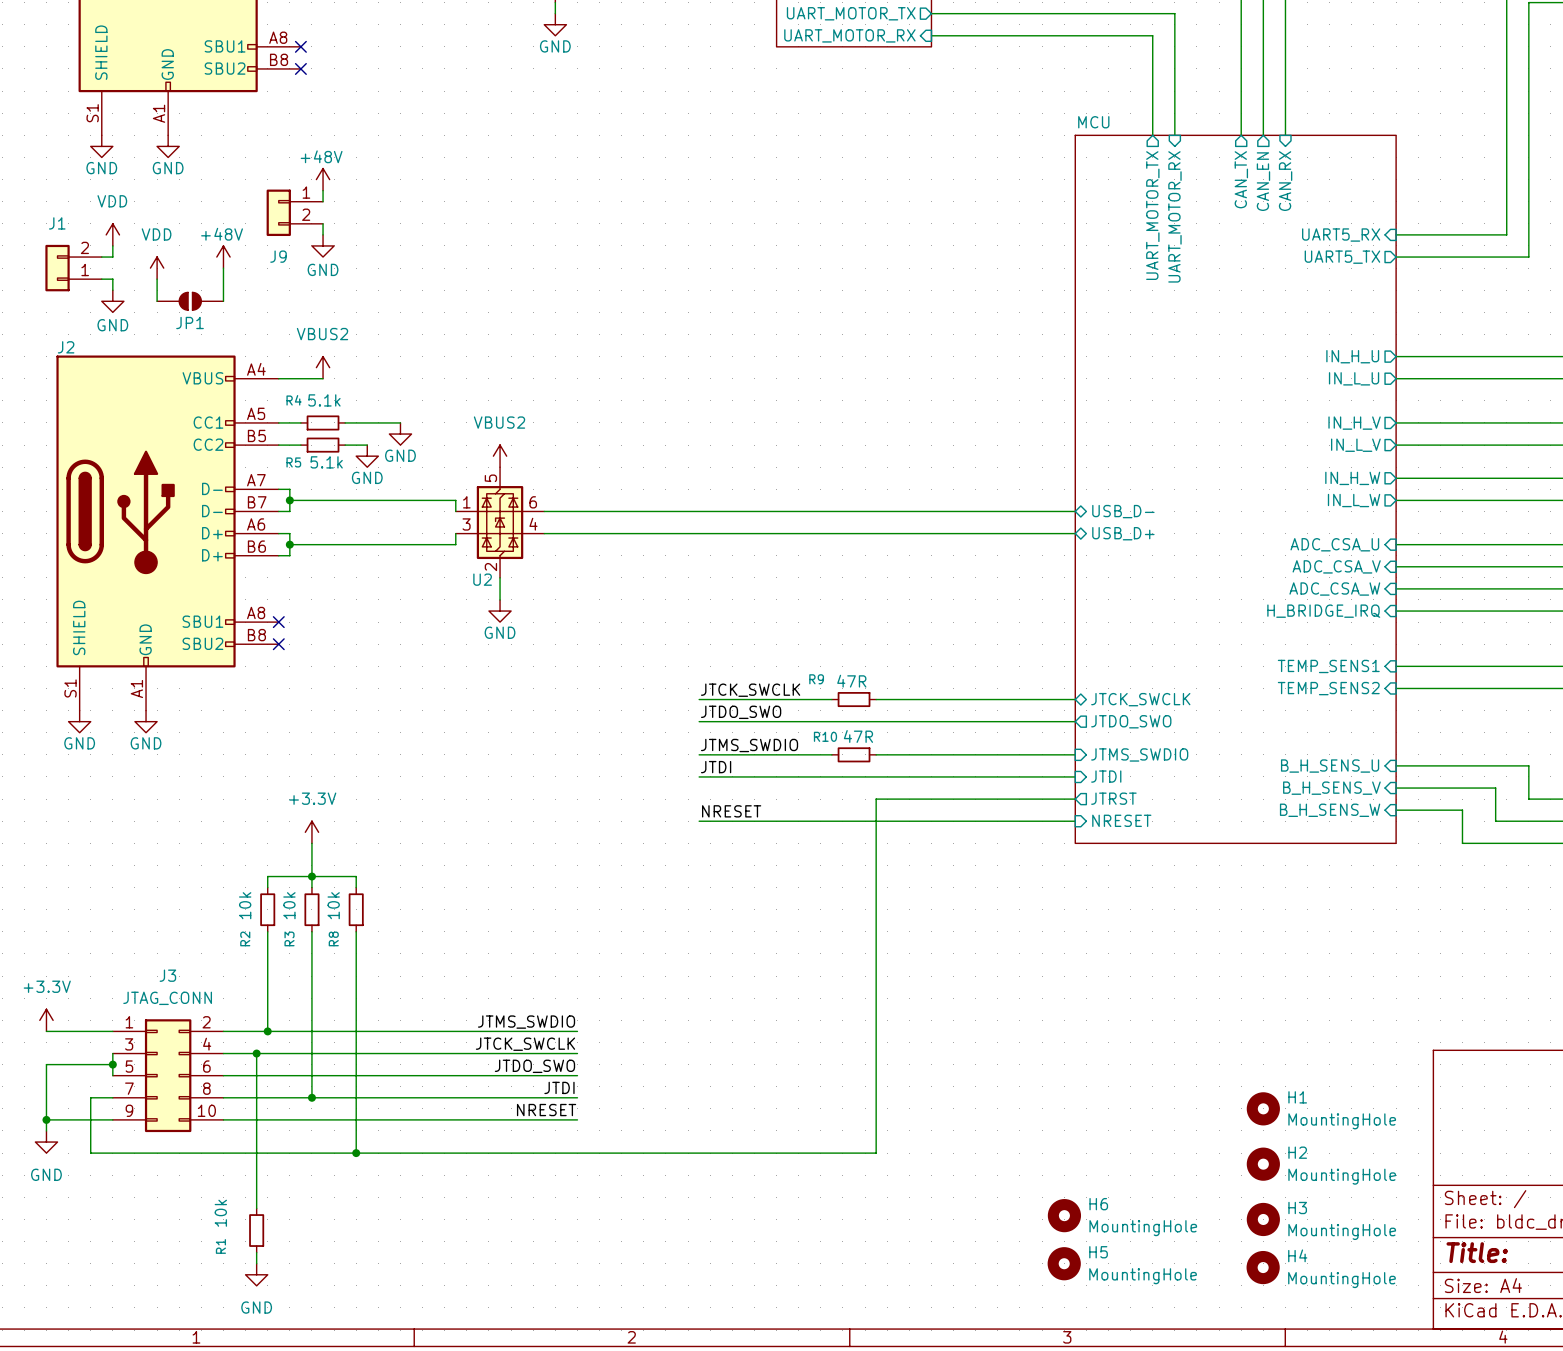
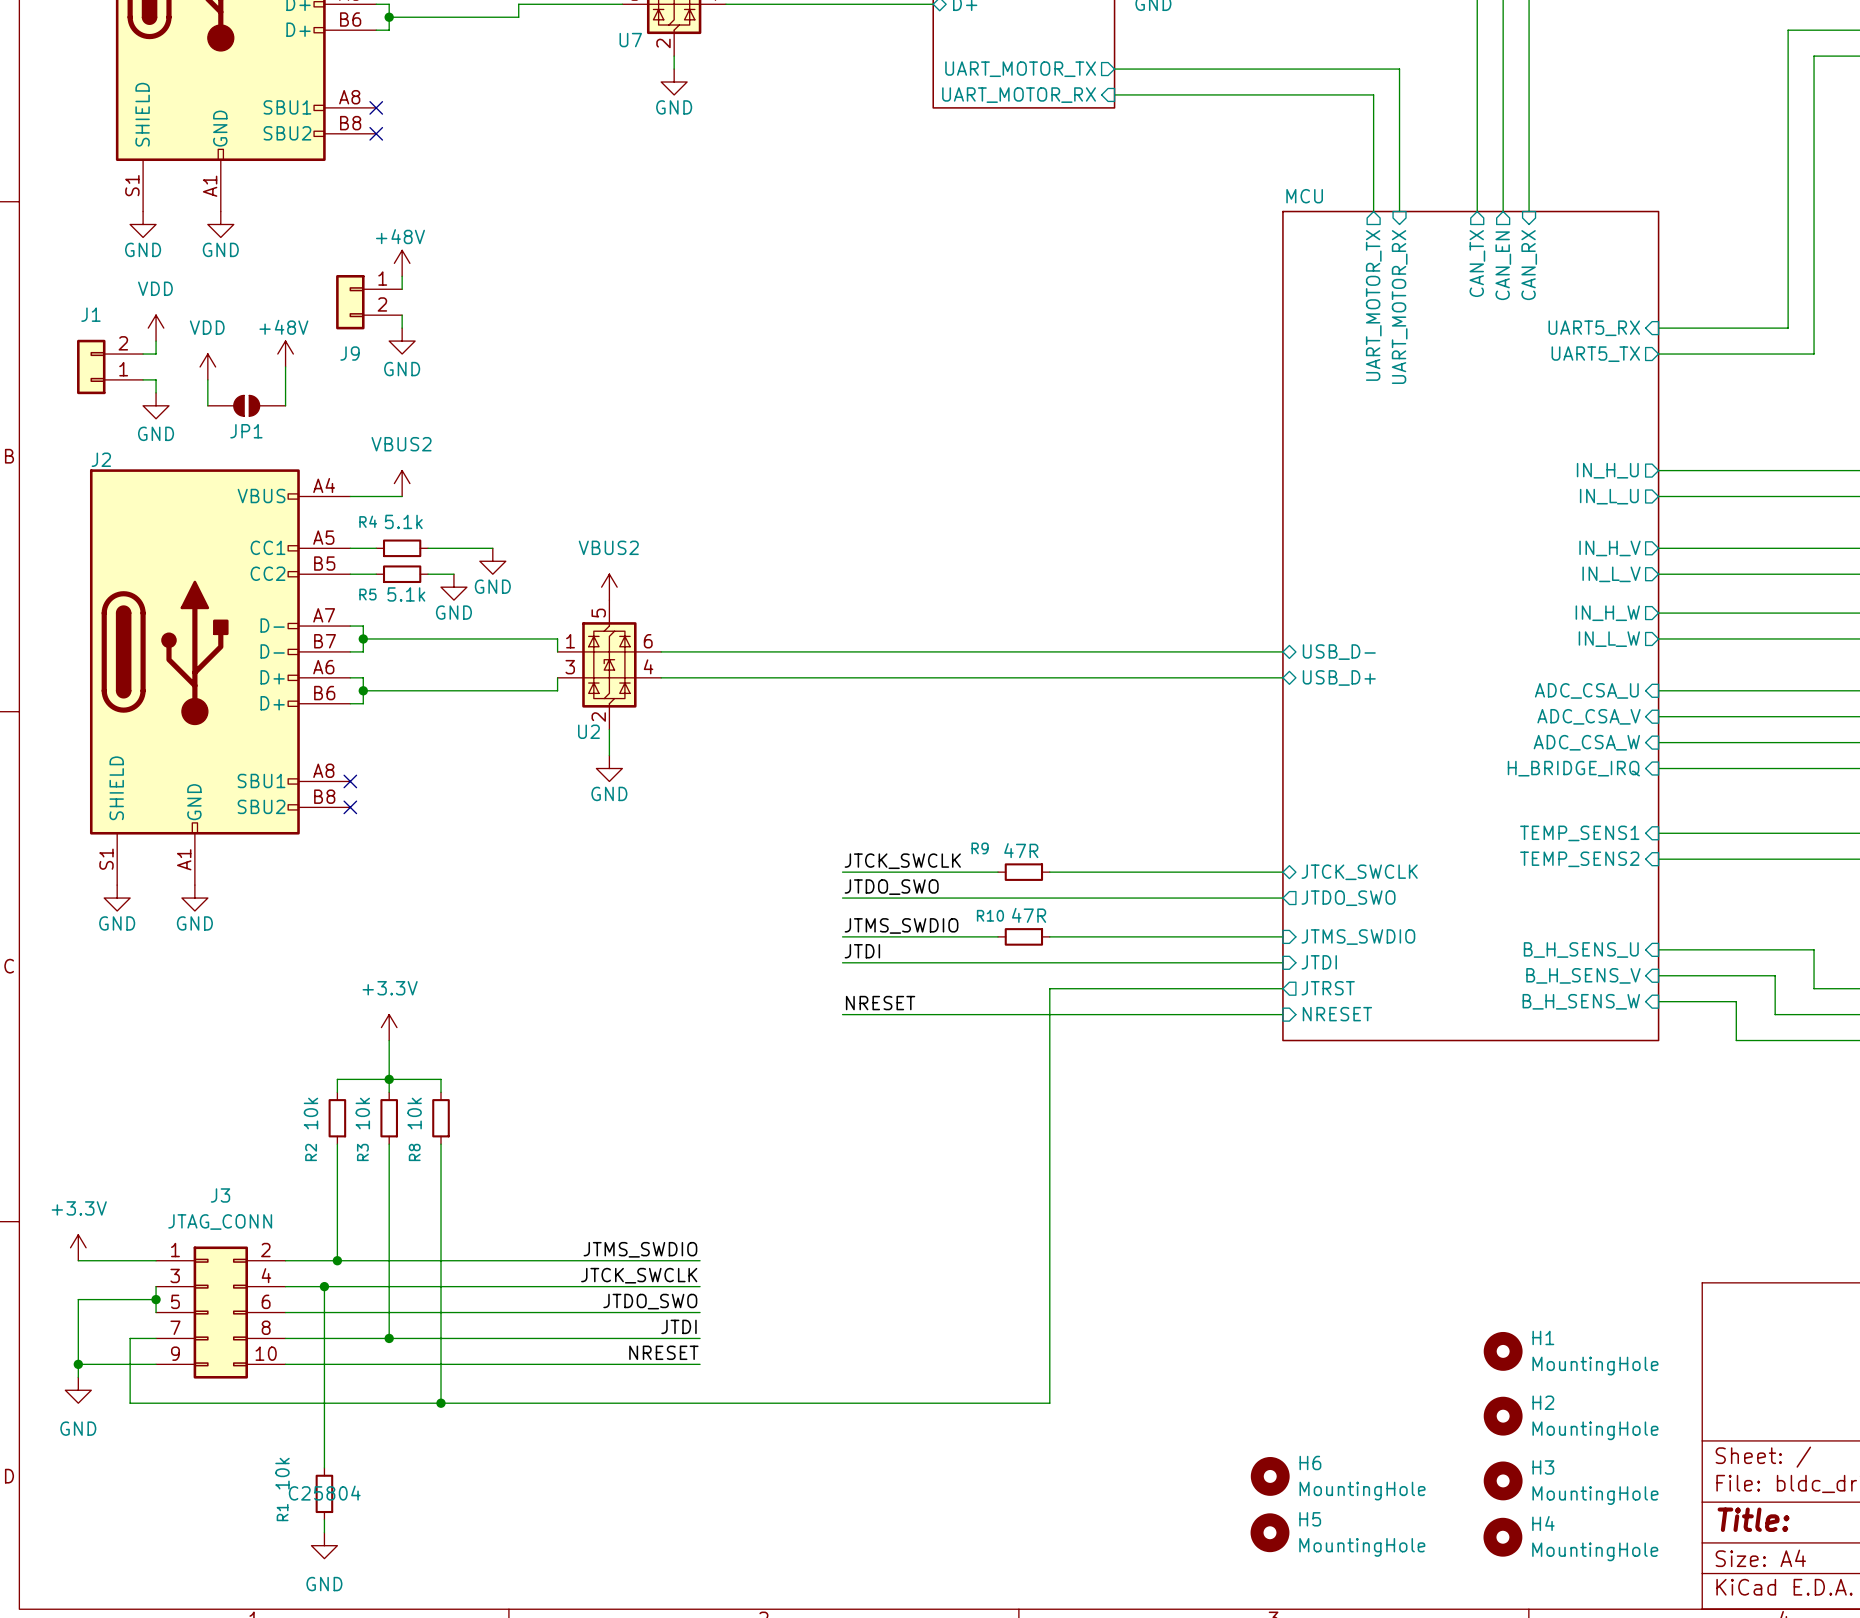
R1 text: none -> C25804 (324, 1493)

